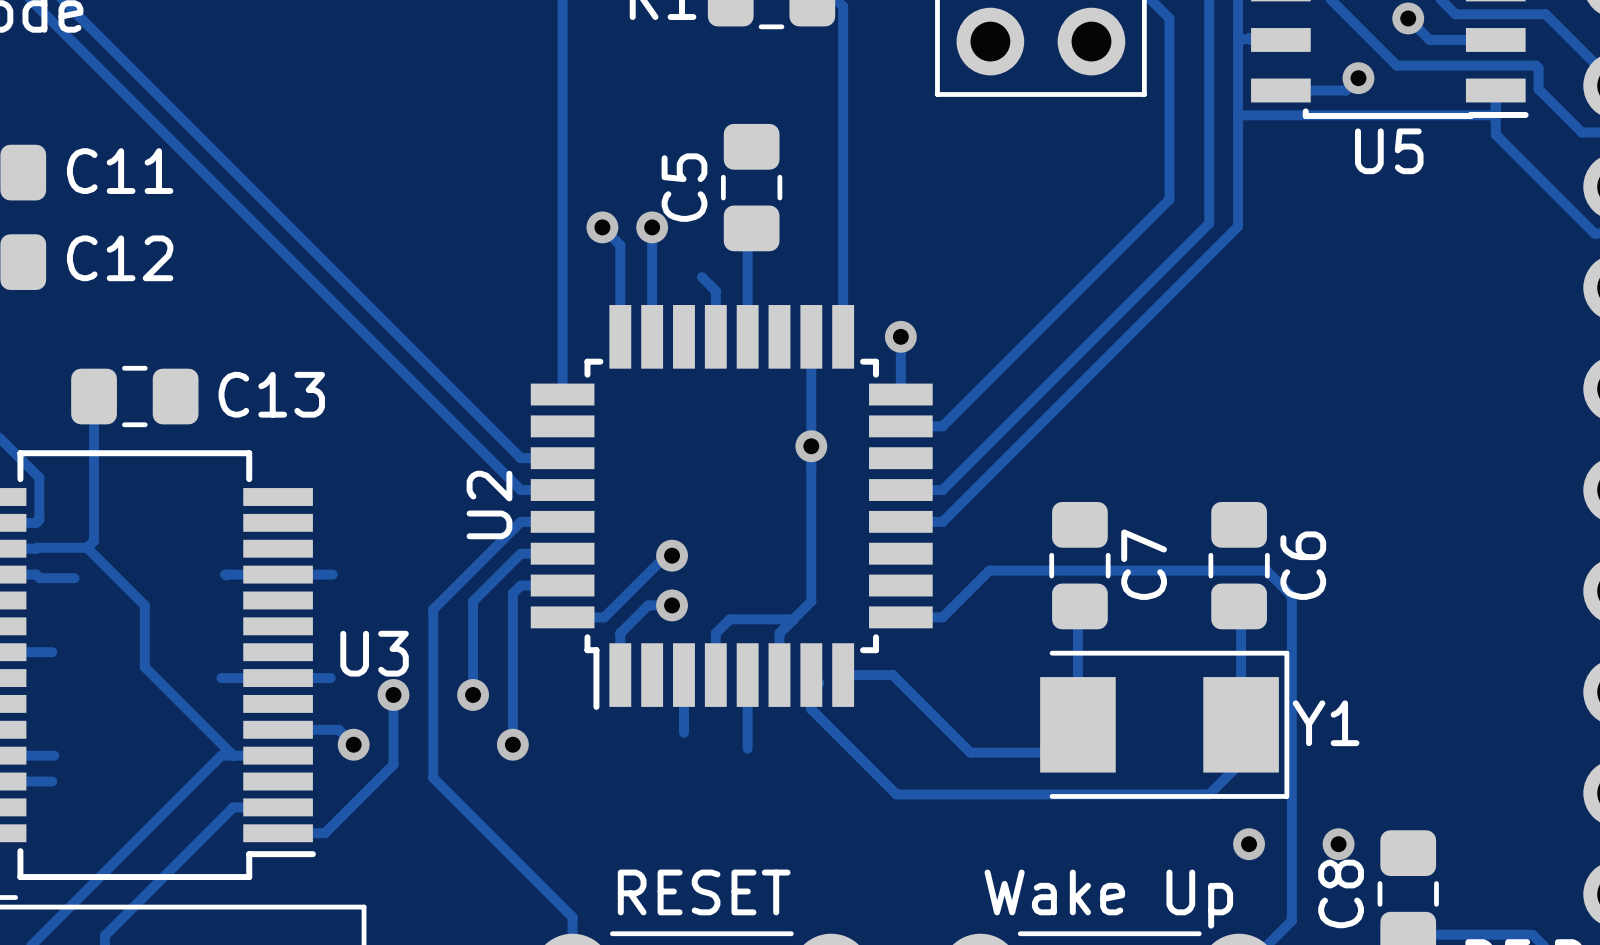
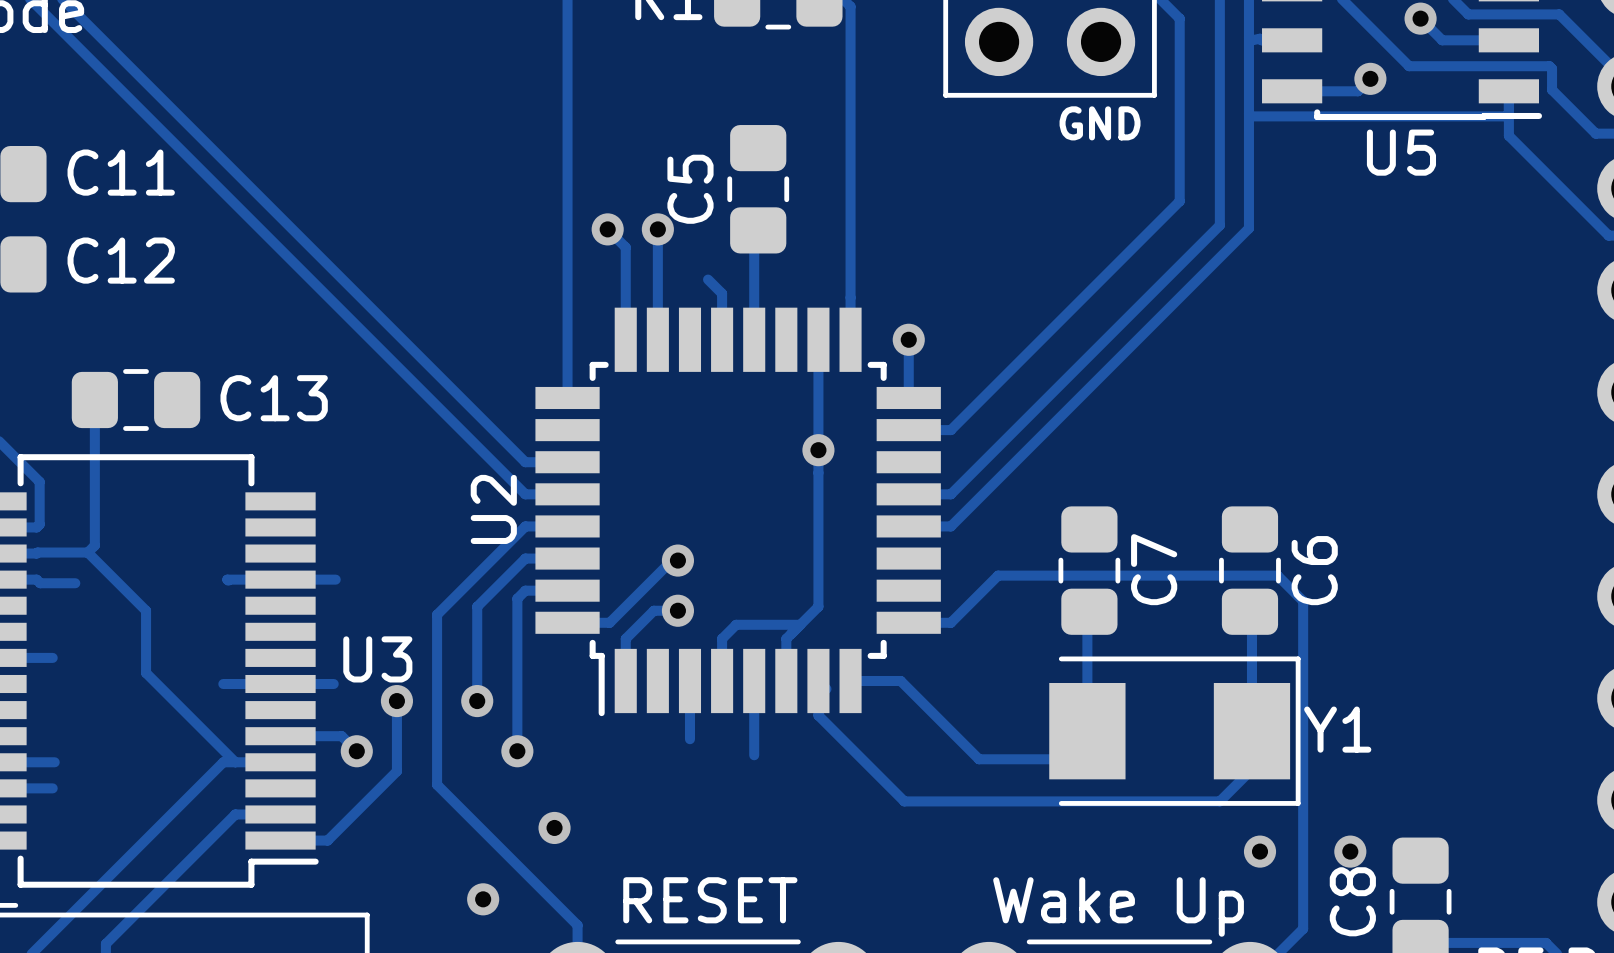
text: none -> GND (1100, 123)
via: none -> (554, 827)
via: none -> (483, 899)

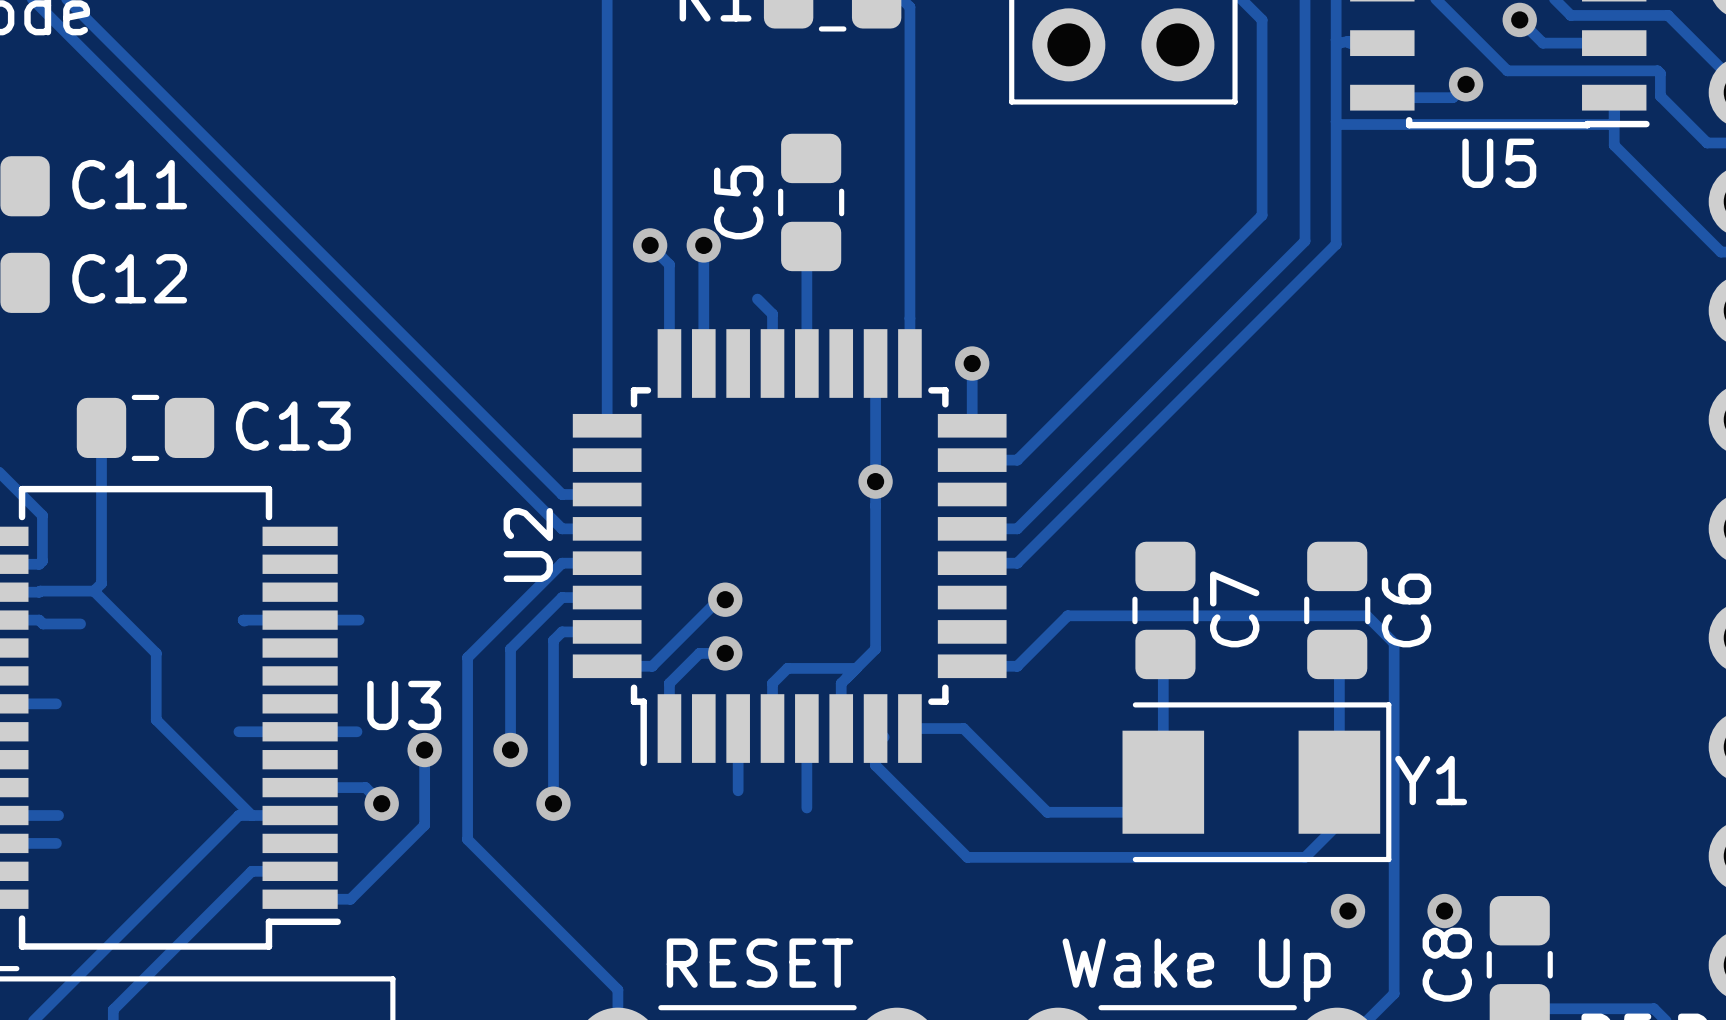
text: GND (1100, 123) -> none
via: (554, 827) -> none
via: (483, 899) -> none

